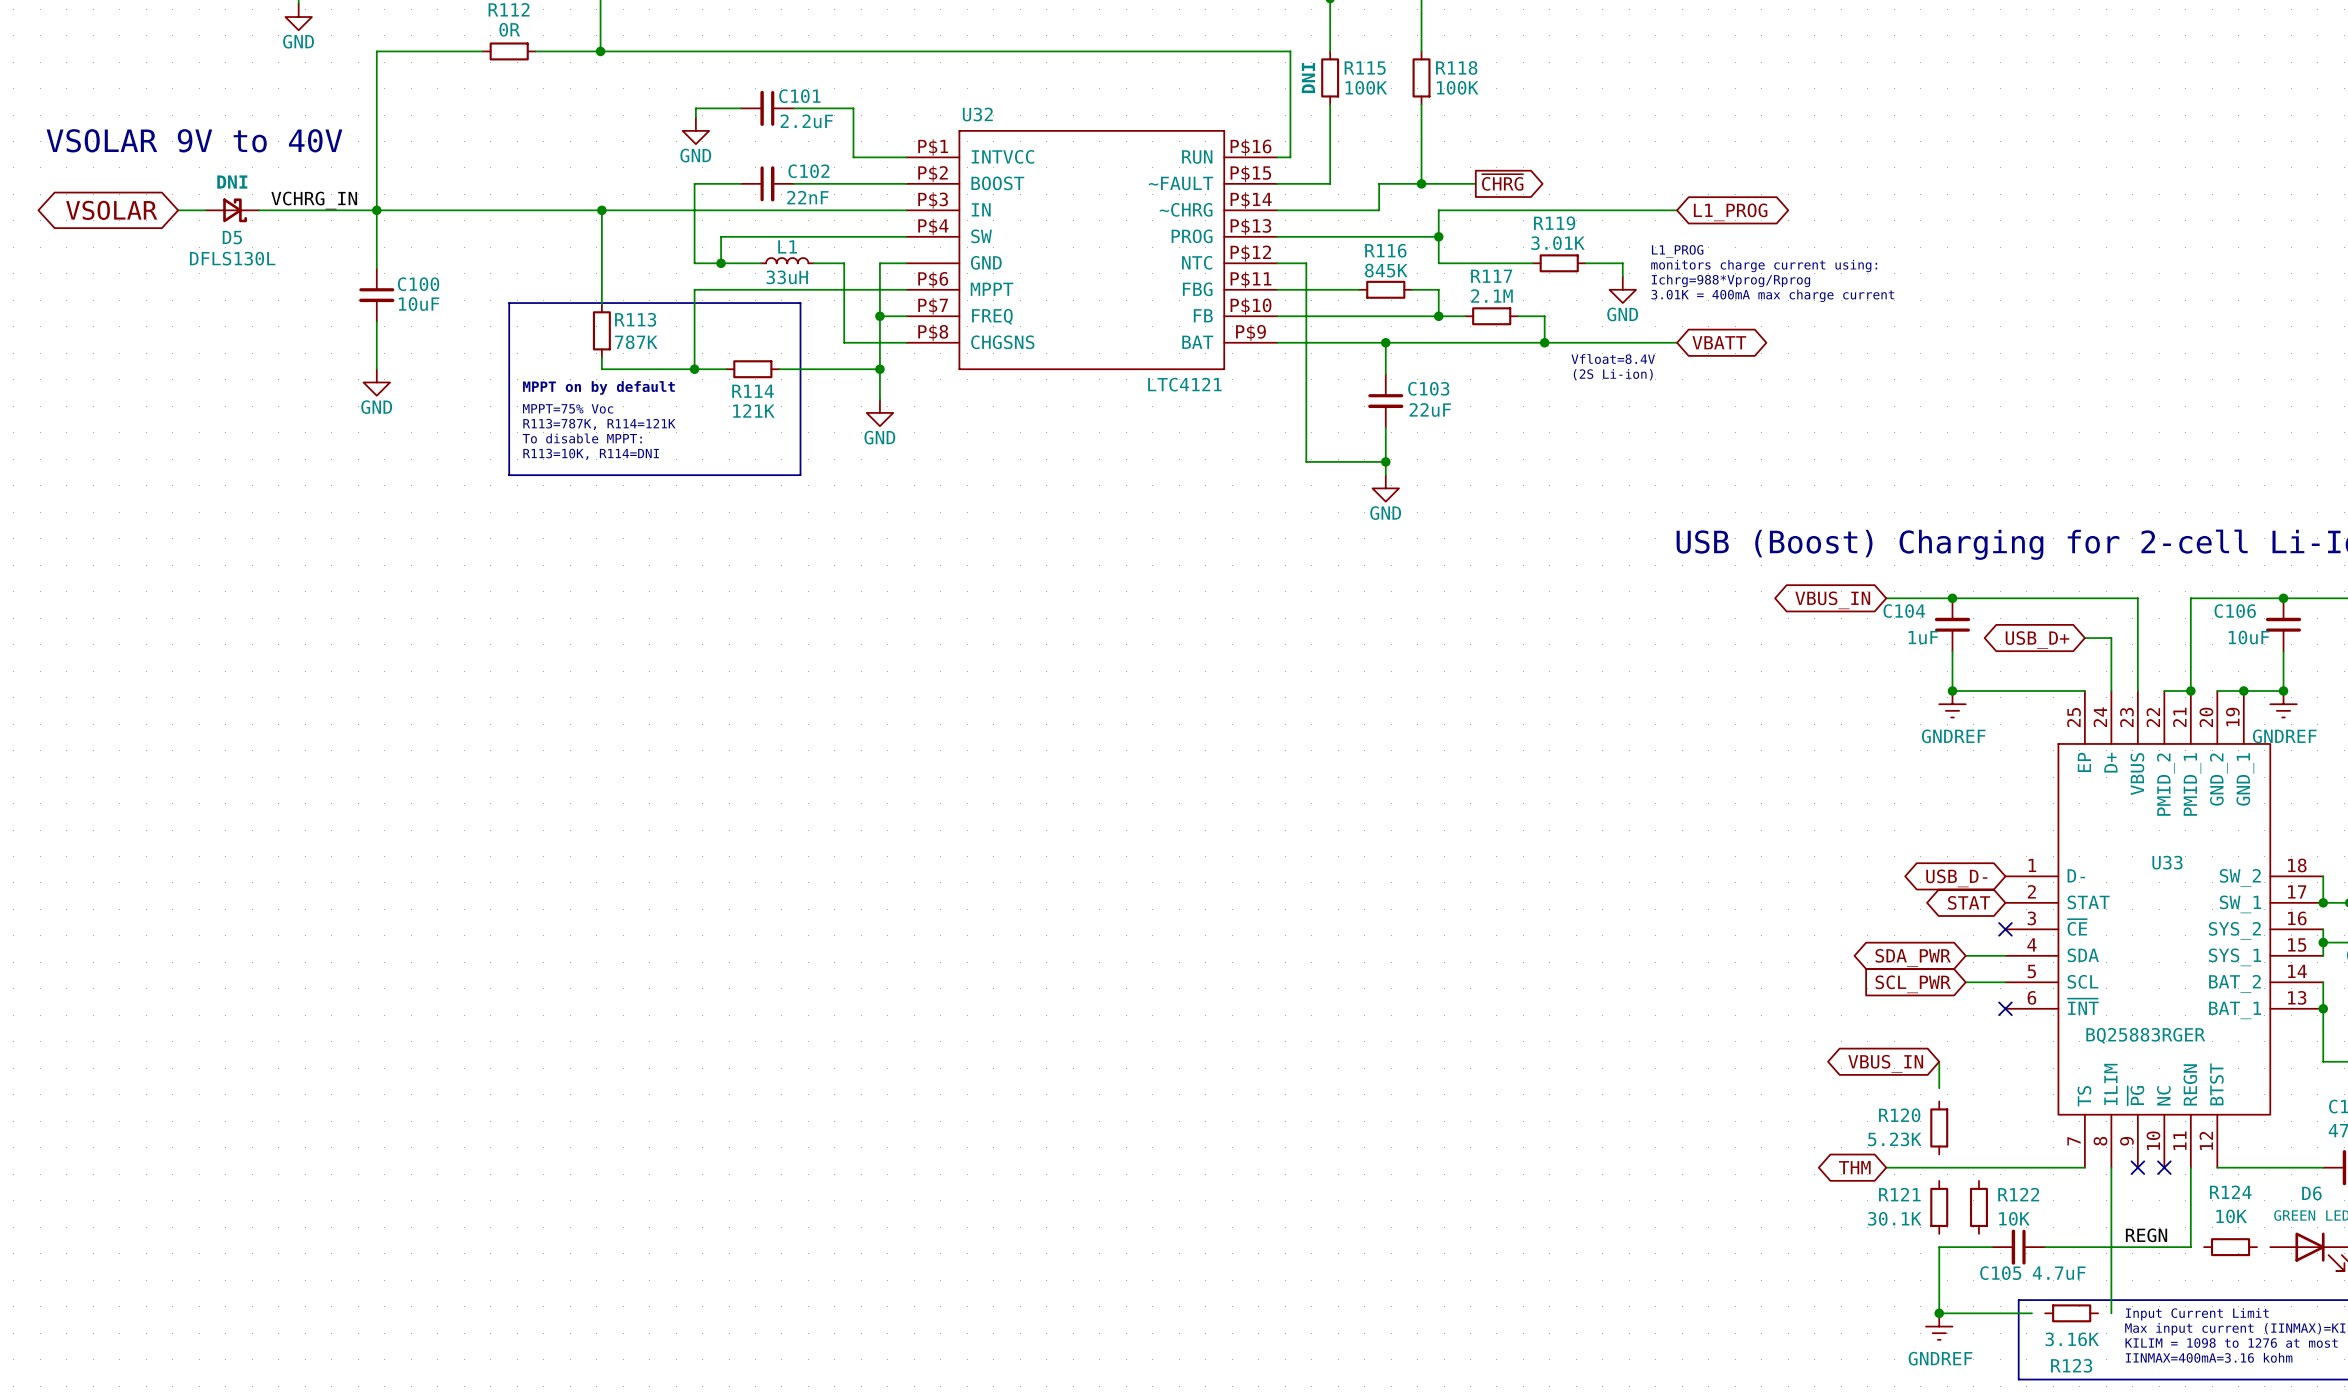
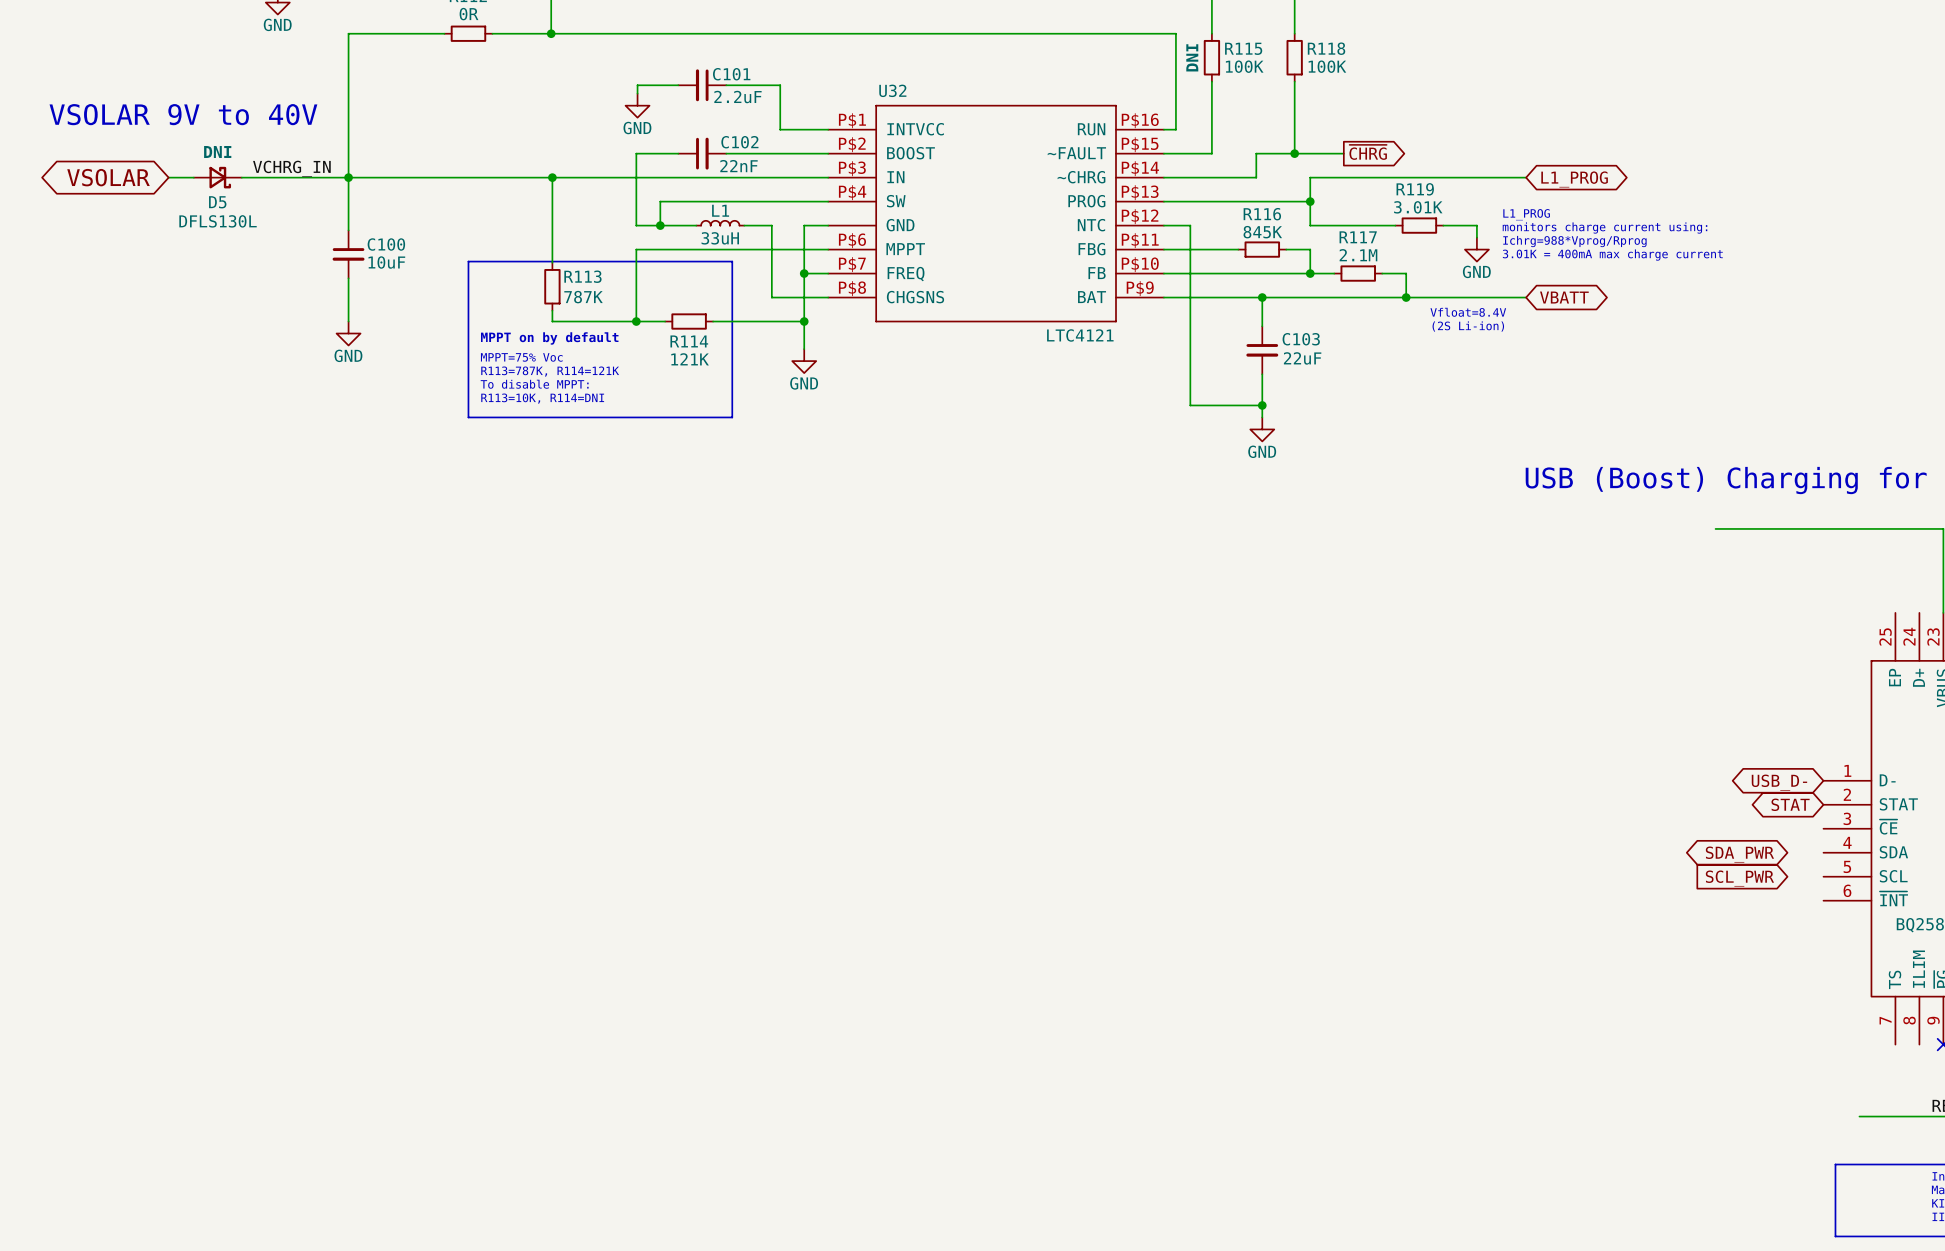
junction: (1952, 598) -> none
global label: VBUS_IN (1832, 600) -> none
C104: 1uF (1952, 624) -> none
wire: (2084, 638) (2111, 638) (2111, 691) -> none
global label: USB_D+ (2037, 640) -> none
wire: (1952, 651) (1952, 691) (2084, 691) -> none
junction: (1952, 691) -> none
power symbol: GNDREF (1952, 704) -> none
no-connect mark: (2005, 929) -> none
wire: (1965, 955) (2005, 955) -> none
wire: (1965, 982) (2005, 982) -> none
no-connect mark: (2005, 1008) -> none
wire: (1939, 1061) (1939, 1088) -> none
global label: VBUS_IN (1885, 1063) -> none
R120: 5.23K (1939, 1127) -> none
global label: THM (1854, 1167) -> none
wire: (1886, 1167) (2084, 1167) -> none
wire: (2111, 1167) (2111, 1313) -> none
R121: 30.1K (1939, 1207) -> none
R122: 10K (1978, 1207) -> none
wire: (1992, 1247) (1939, 1247) (1939, 1313) (2031, 1313) -> none
C105: 4.7uF (2018, 1247) -> none
junction: (1939, 1313) -> none
R123: 3.16K (2071, 1313) -> none
power symbol: GNDREF (1939, 1326) -> none

